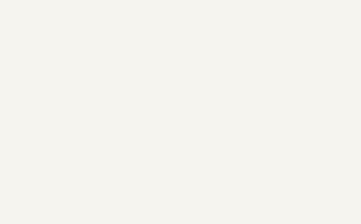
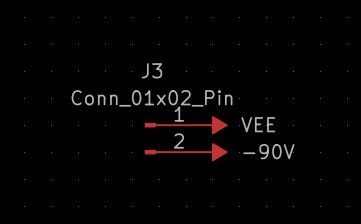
power symbol: none -> VEE (212, 125)
J3: none -> Conn_01x02_Pin (172, 138)
power symbol: none -> -90V (212, 152)

